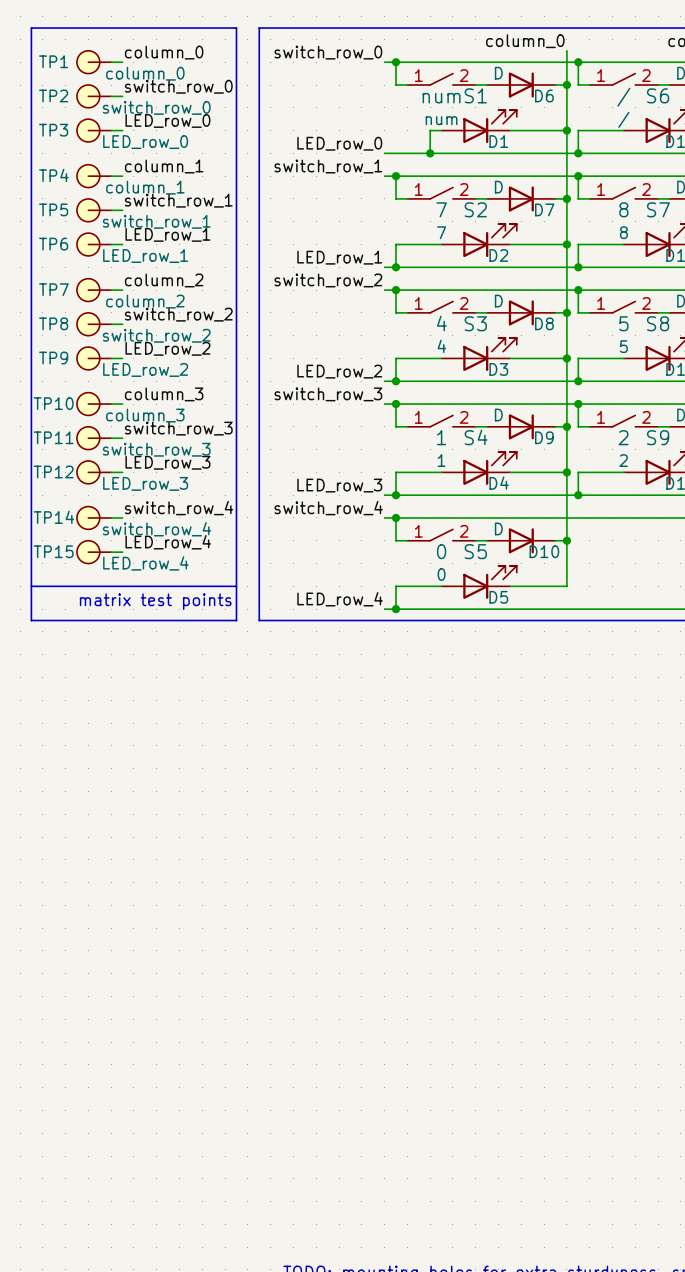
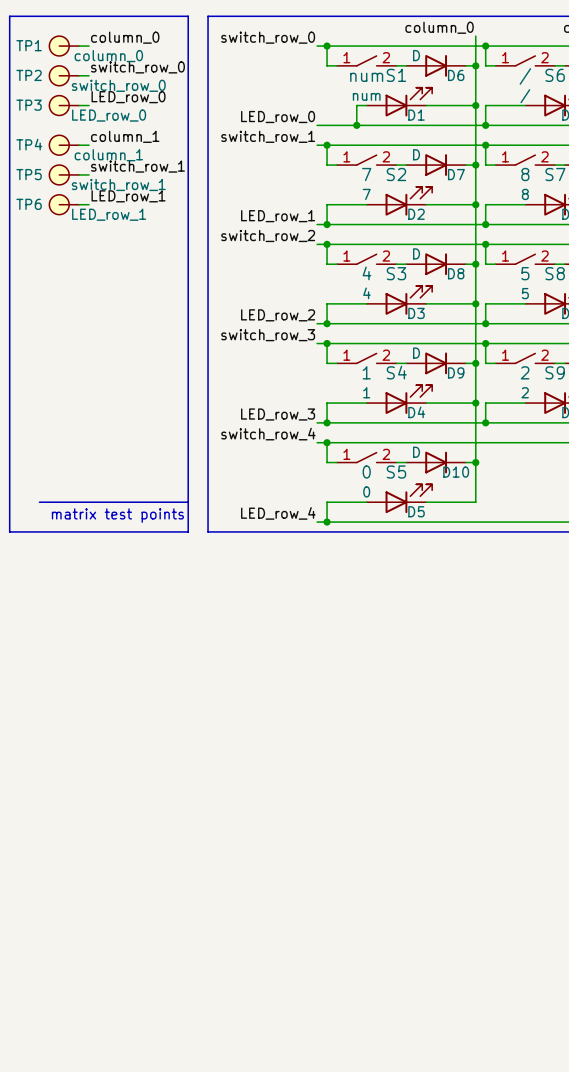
label: column_2 (164, 280) -> none
TP7: column_2 (94, 290) -> none
wire: (111, 290) (122, 290) -> none
label: switch_row_2 (178, 314) -> none
TP8: switch_row_2 (94, 324) -> none
wire: (111, 324) (122, 324) -> none
label: LED_row_2 (167, 348) -> none
TP9: LED_row_2 (94, 358) -> none
wire: (111, 358) (122, 358) -> none
label: column_3 (164, 394) -> none
TP10: column_3 (94, 404) -> none
wire: (111, 404) (122, 404) -> none
label: switch_row_3 (178, 428) -> none
TP11: switch_row_3 (94, 438) -> none
wire: (111, 438) (122, 438) -> none
label: LED_row_3 (167, 462) -> none
TP12: LED_row_3 (94, 472) -> none
wire: (111, 472) (122, 472) -> none
label: switch_row_4 (179, 508) -> none
TP14: switch_row_4 (94, 517) -> none
wire: (111, 517) (122, 517) -> none
label: LED_row_4 (168, 542) -> none
TP15: LED_row_4 (94, 552) -> none
wire: (111, 552) (122, 552) -> none
line: (31, 586) (65, 586) -> none

